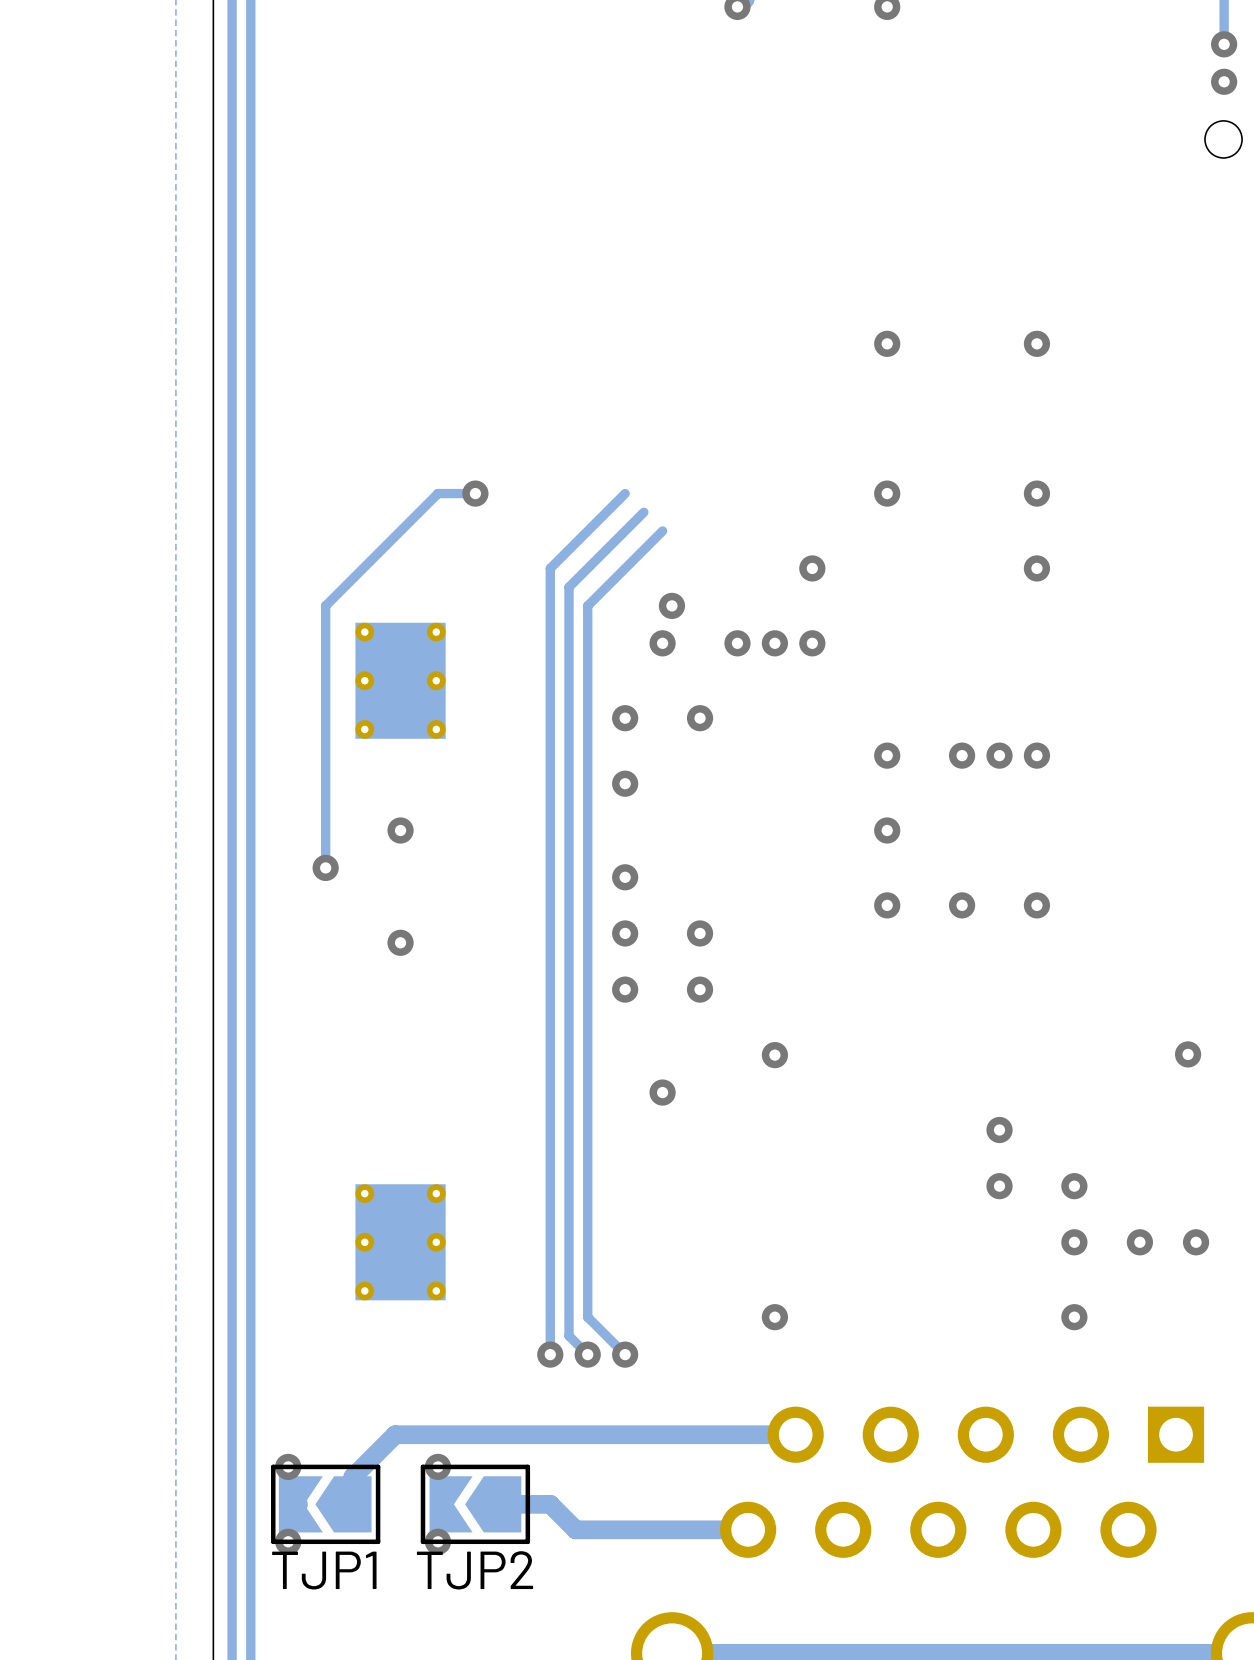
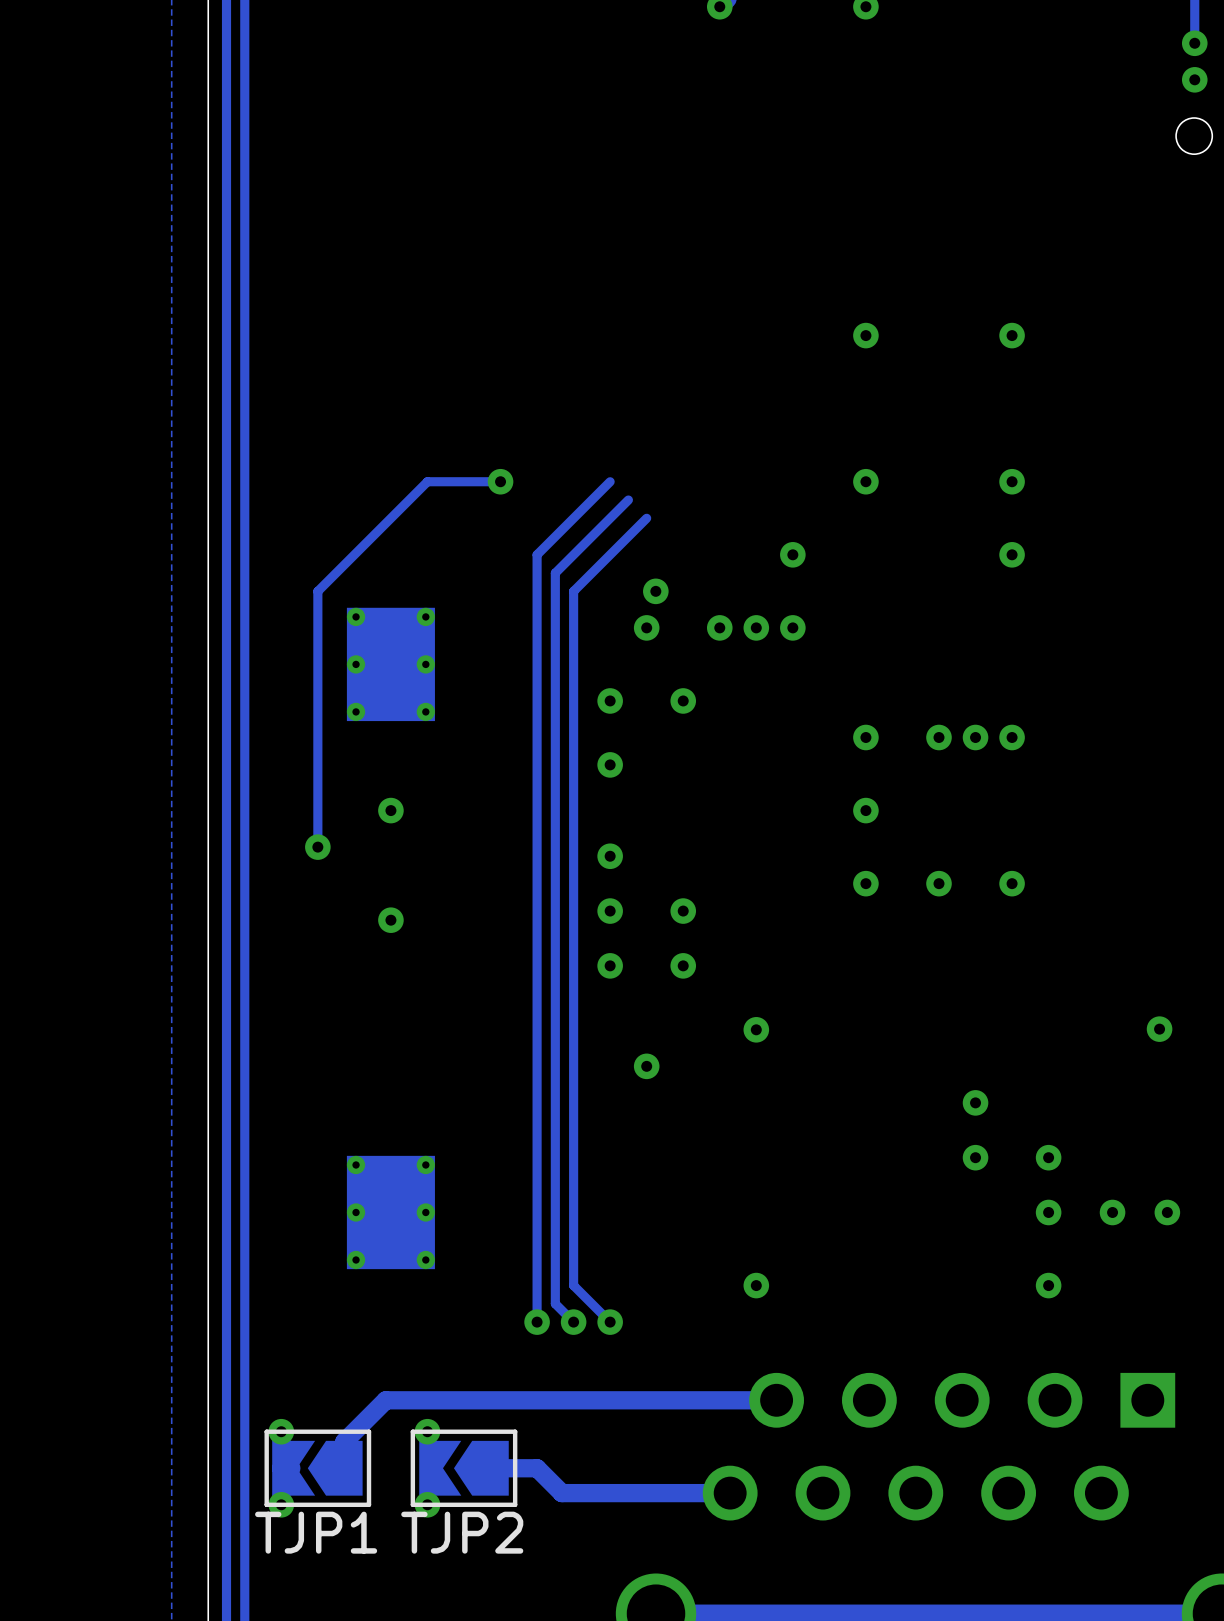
via position: (475, 493) -> (500, 481)
track: none -> (500, 481) (464, 481)

